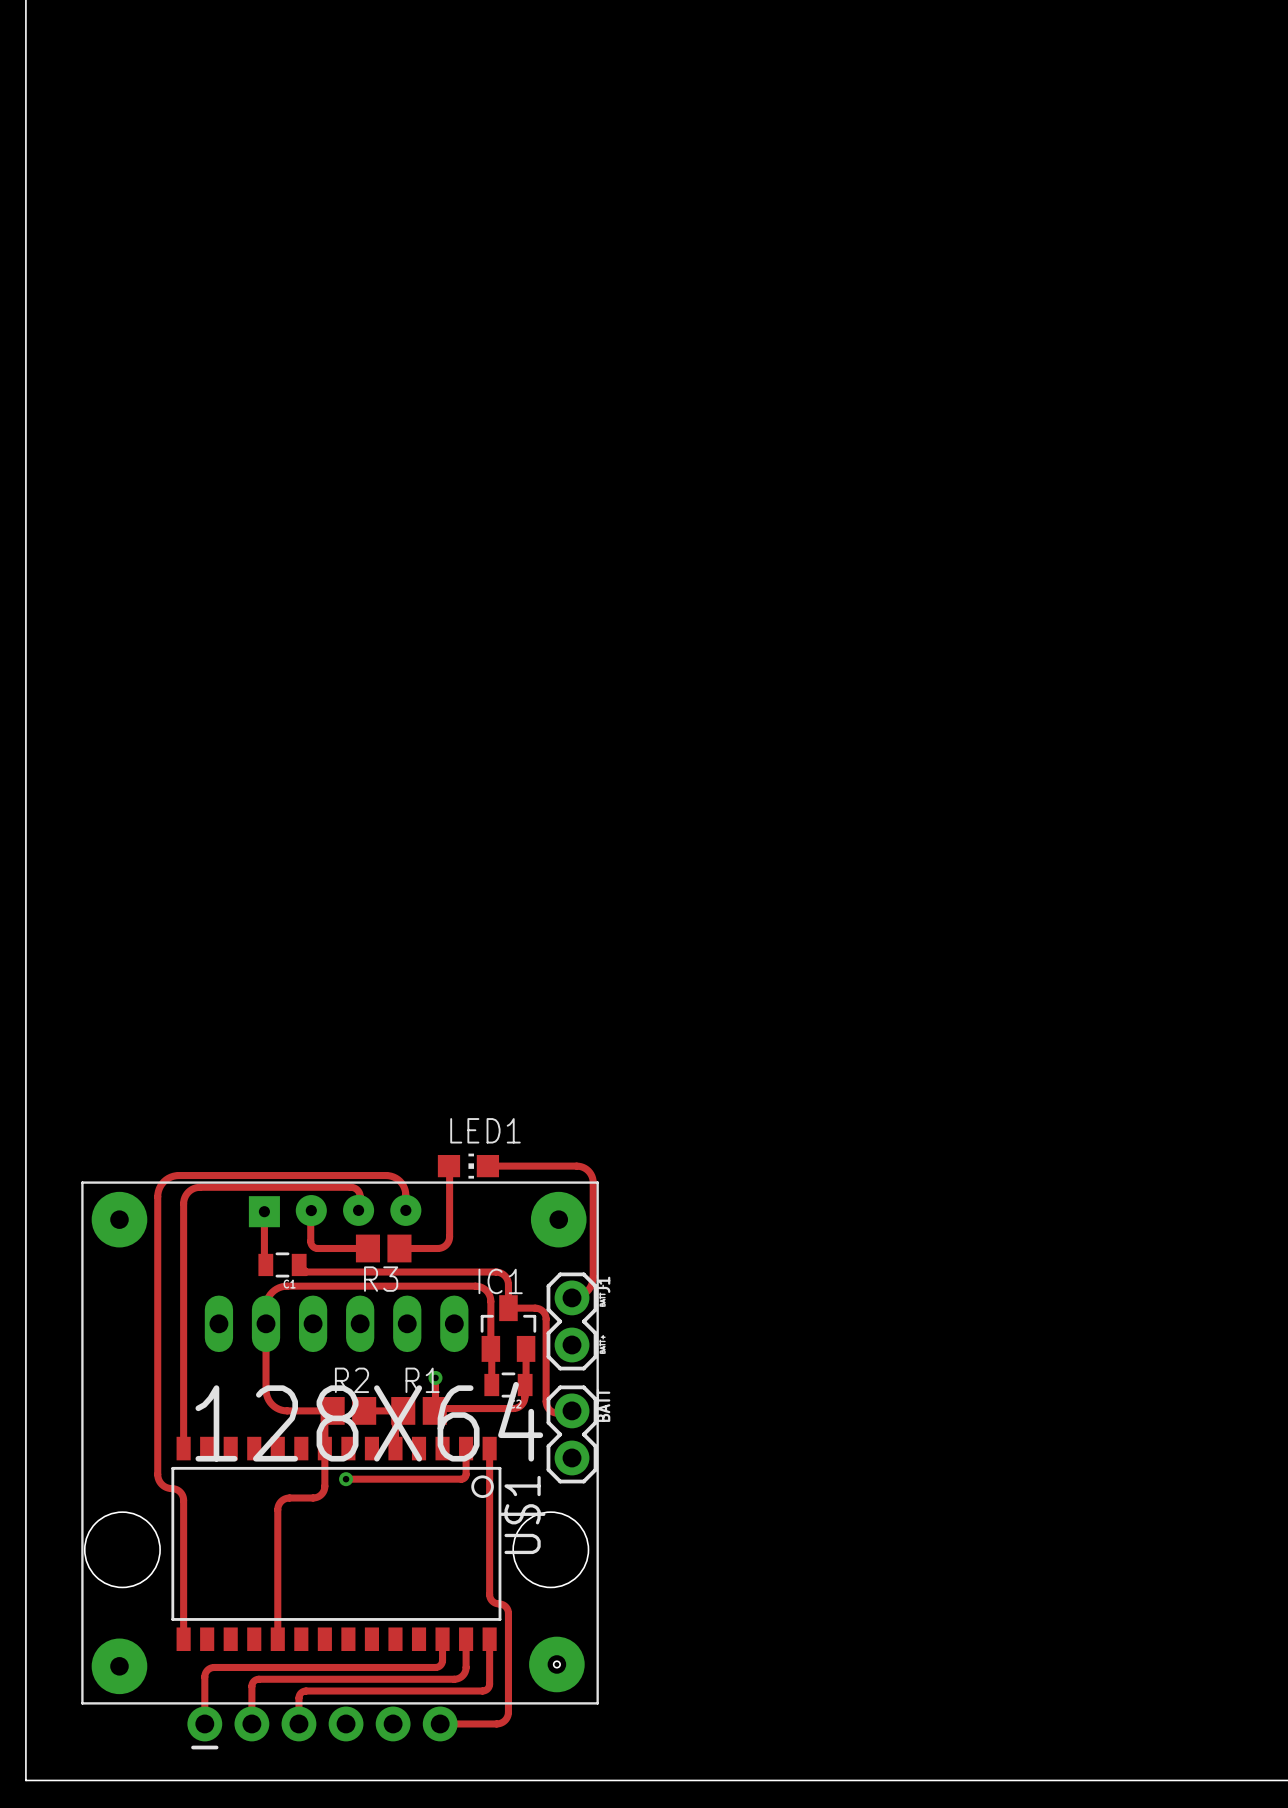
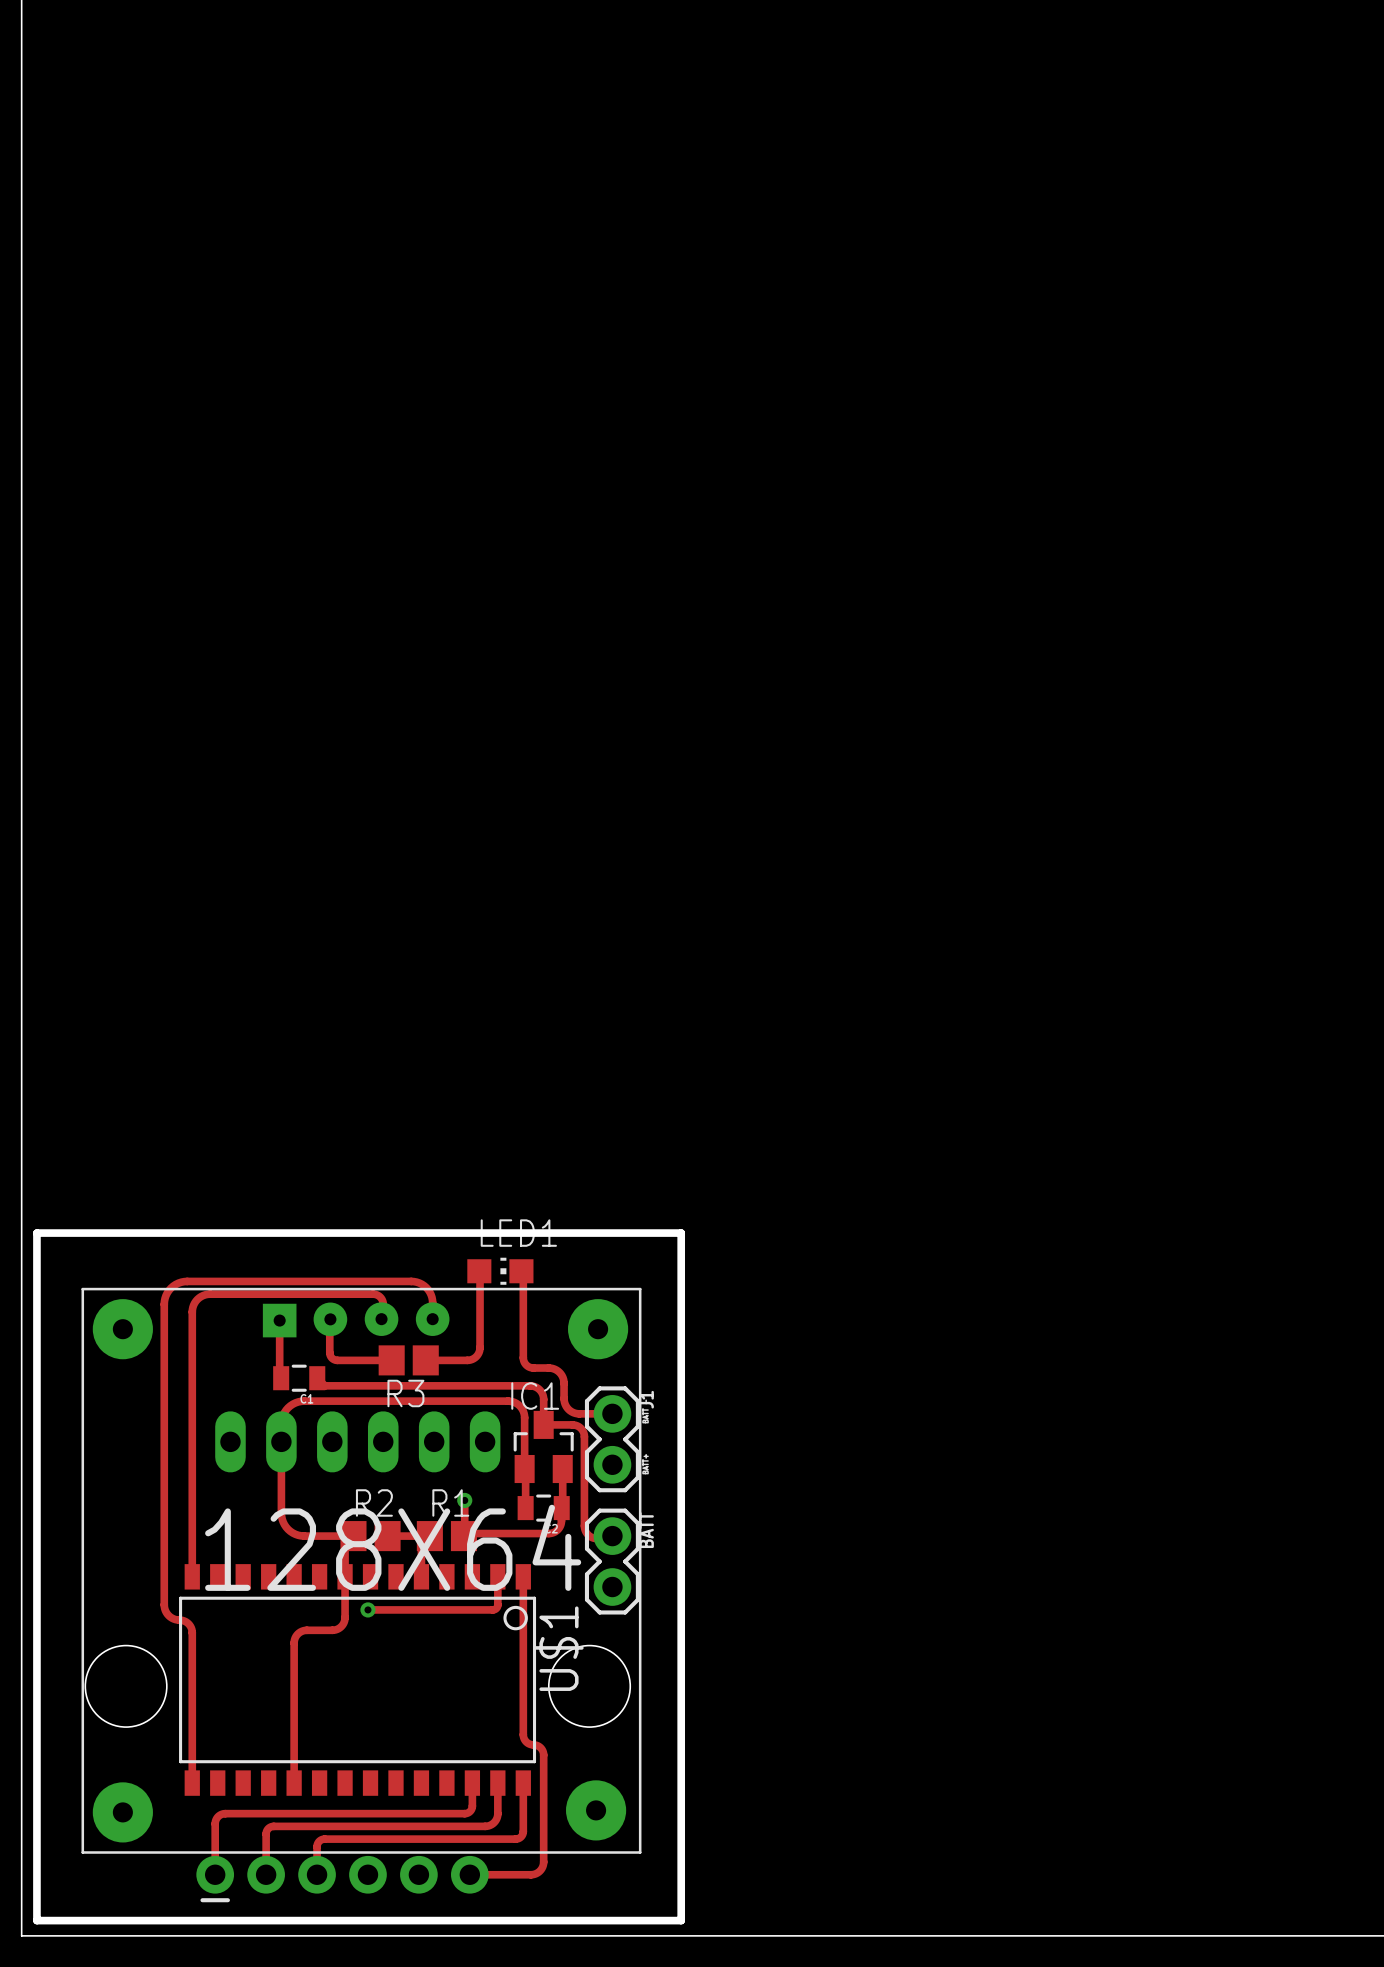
board edge: none -> (36, 1233) (681, 1233) (681, 1920) (36, 1920) (36, 1233)
track: (491, 1166) (578, 1166) (586, 1169) (590, 1174) (593, 1182) (593, 1279) (590, 1287) (584, 1293) (572, 1297) -> (521, 1271) (523, 1273) (524, 1362) (530, 1367) (550, 1368) (559, 1372) (563, 1381) (564, 1402) (571, 1411) (579, 1413) (612, 1413)
part footprint: [81, 1181, 599, 1705] -> [81, 1287, 642, 1854]

